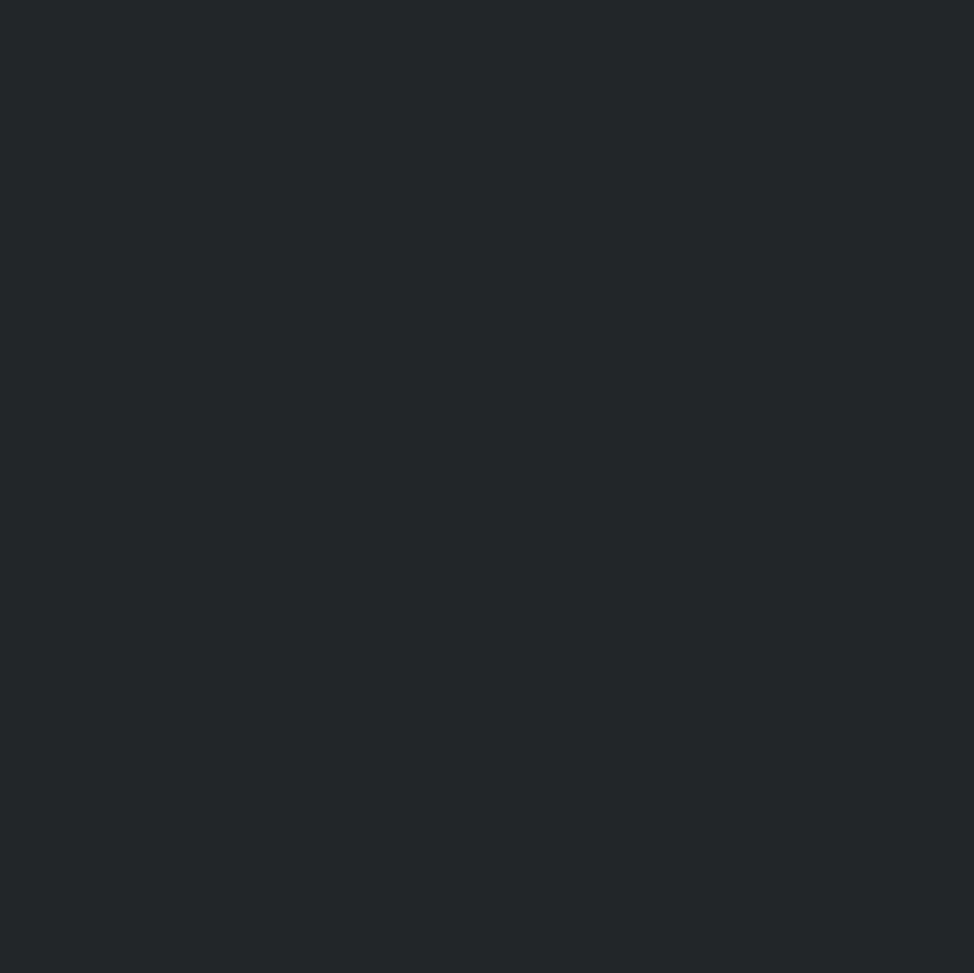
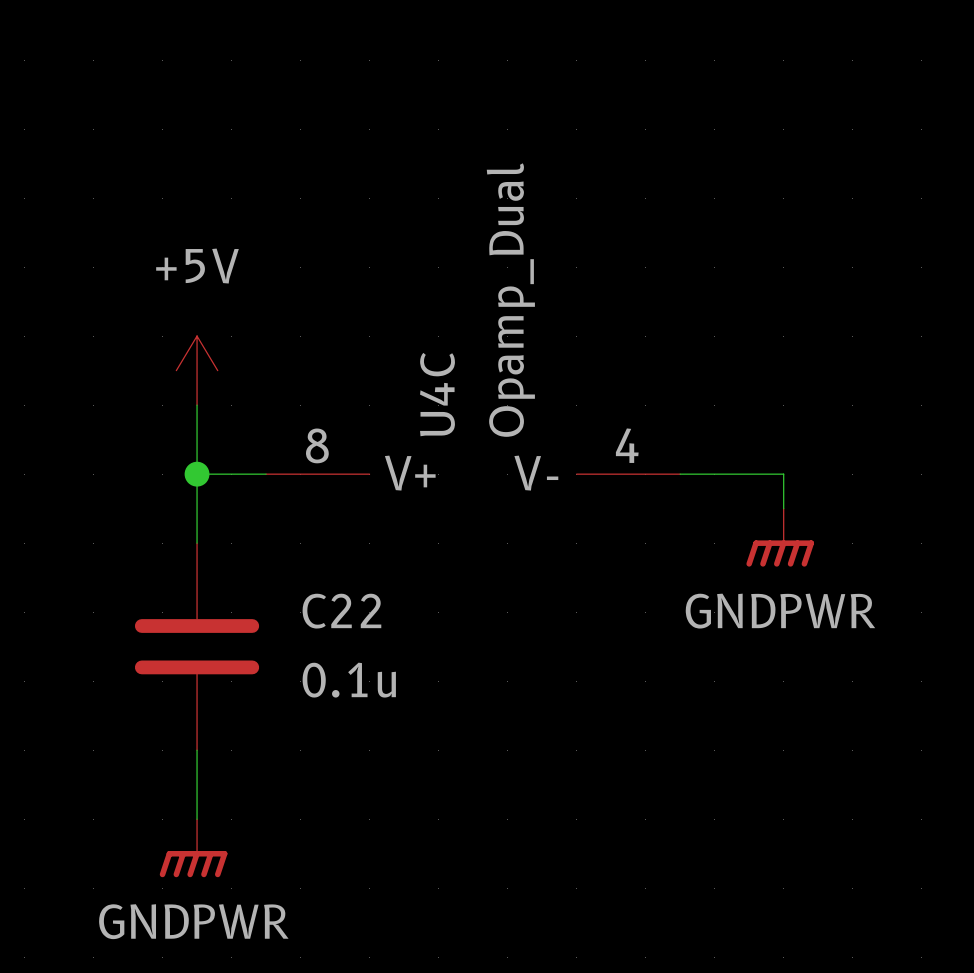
power symbol: none -> +5V (197, 370)
wire: none -> (197, 405) (197, 543)
wire: none -> (197, 474) (266, 474)
junction: none -> (197, 474)
U4C: none -> Opamp_Dual (473, 474)
wire: none -> (680, 474) (783, 474) (783, 508)
power symbol: none -> GNDPWR (780, 537)
C22: none -> 0.1u (197, 646)
wire: none -> (197, 750) (197, 819)
power symbol: none -> GNDPWR (193, 848)

